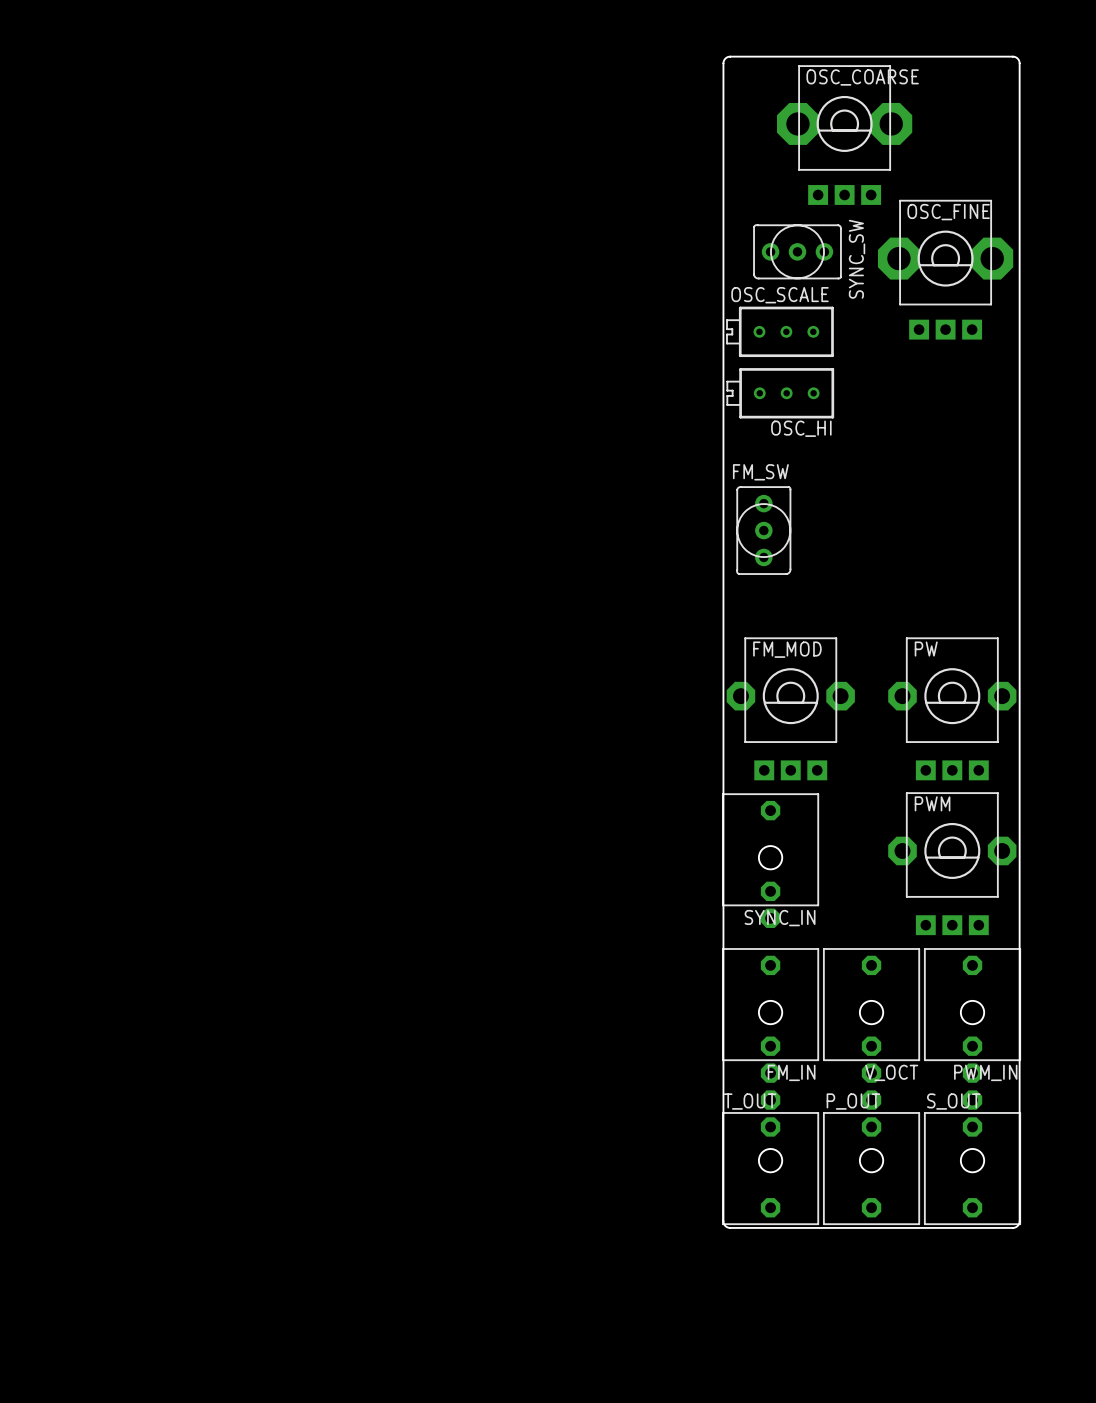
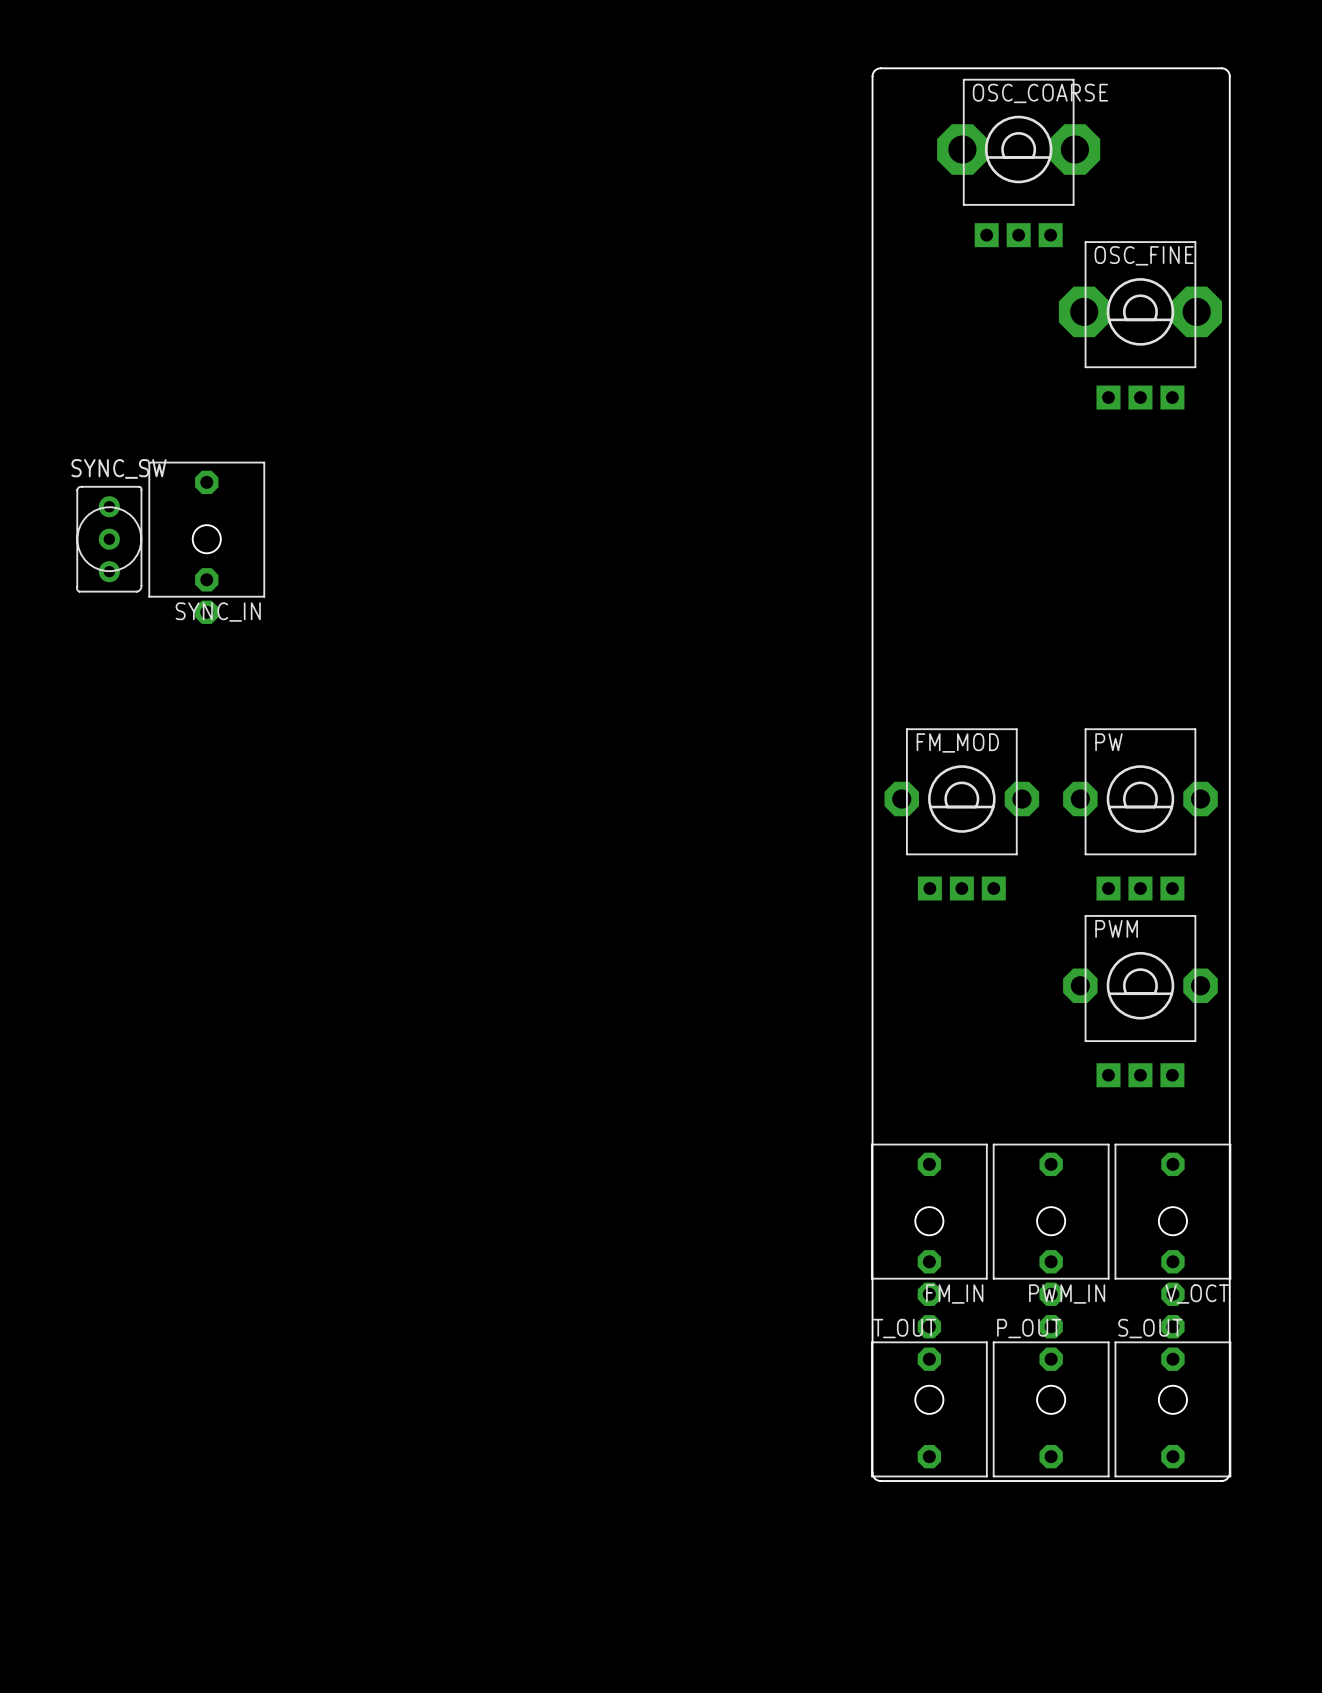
SYNC_SW: (797, 251) -> none
OSC_SCALE: (780, 331) -> none
OSC_HI: (780, 393) -> none
SYNC_SW: none -> (109, 539)
SYNC_IN: none -> (206, 542)
FM_SW: (763, 530) -> none
FM_MOD position: (790, 708) -> (961, 814)
PW position: (952, 708) -> (1140, 814)
SYNC_IN: (770, 860) -> none
PWM position: (952, 863) -> (1140, 1001)
V_OCT name: V_OCT (891, 1072) -> PWM_IN (1067, 1294)
PWM_IN name: PWM_IN (985, 1072) -> V_OCT (1197, 1294)

